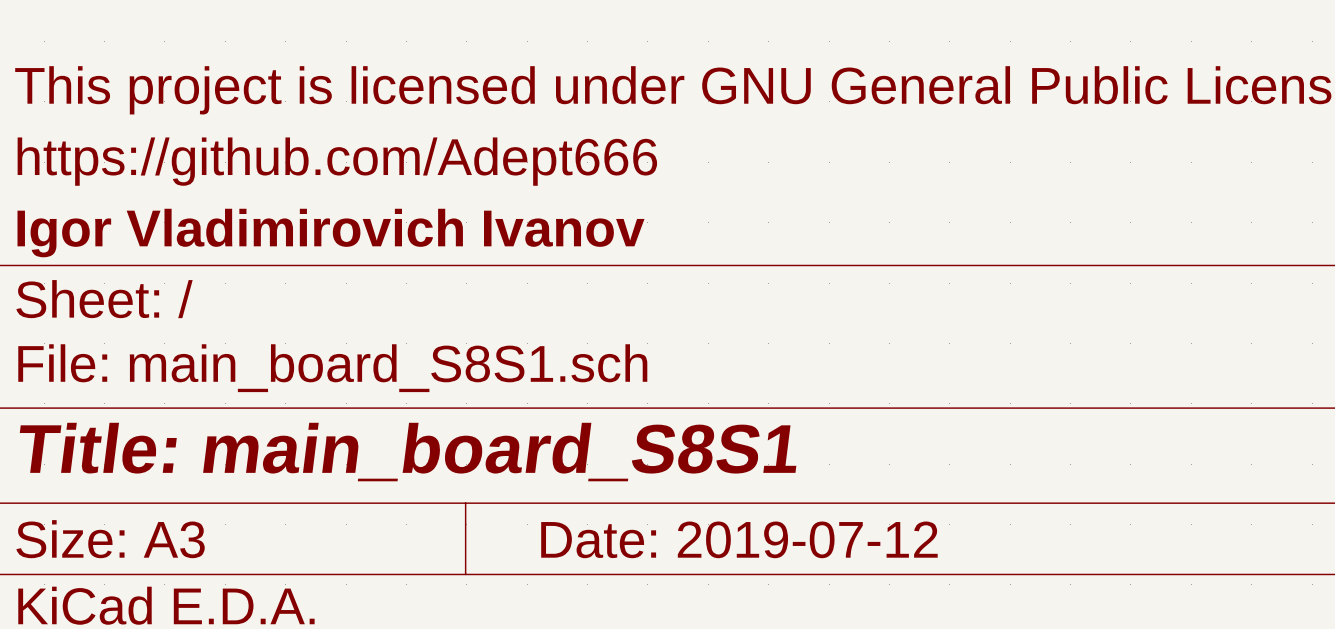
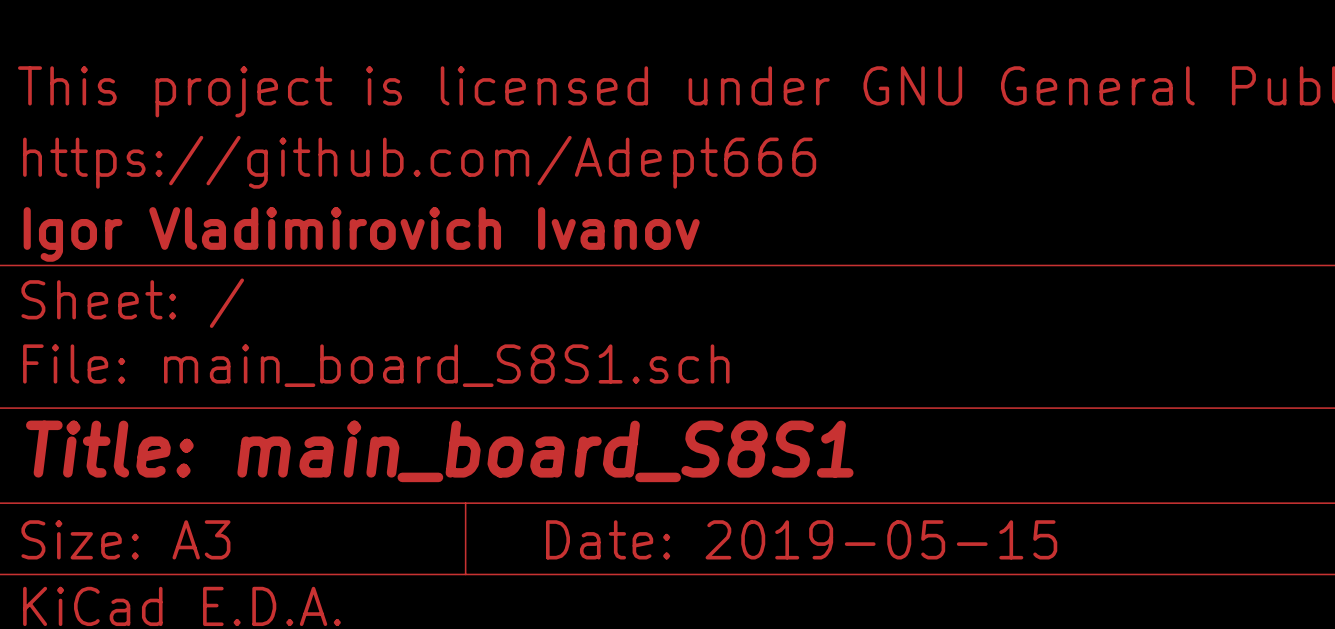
title block: Date: 2019-07-12 (739, 539) -> Date: 2019-05-15 (801, 539)

